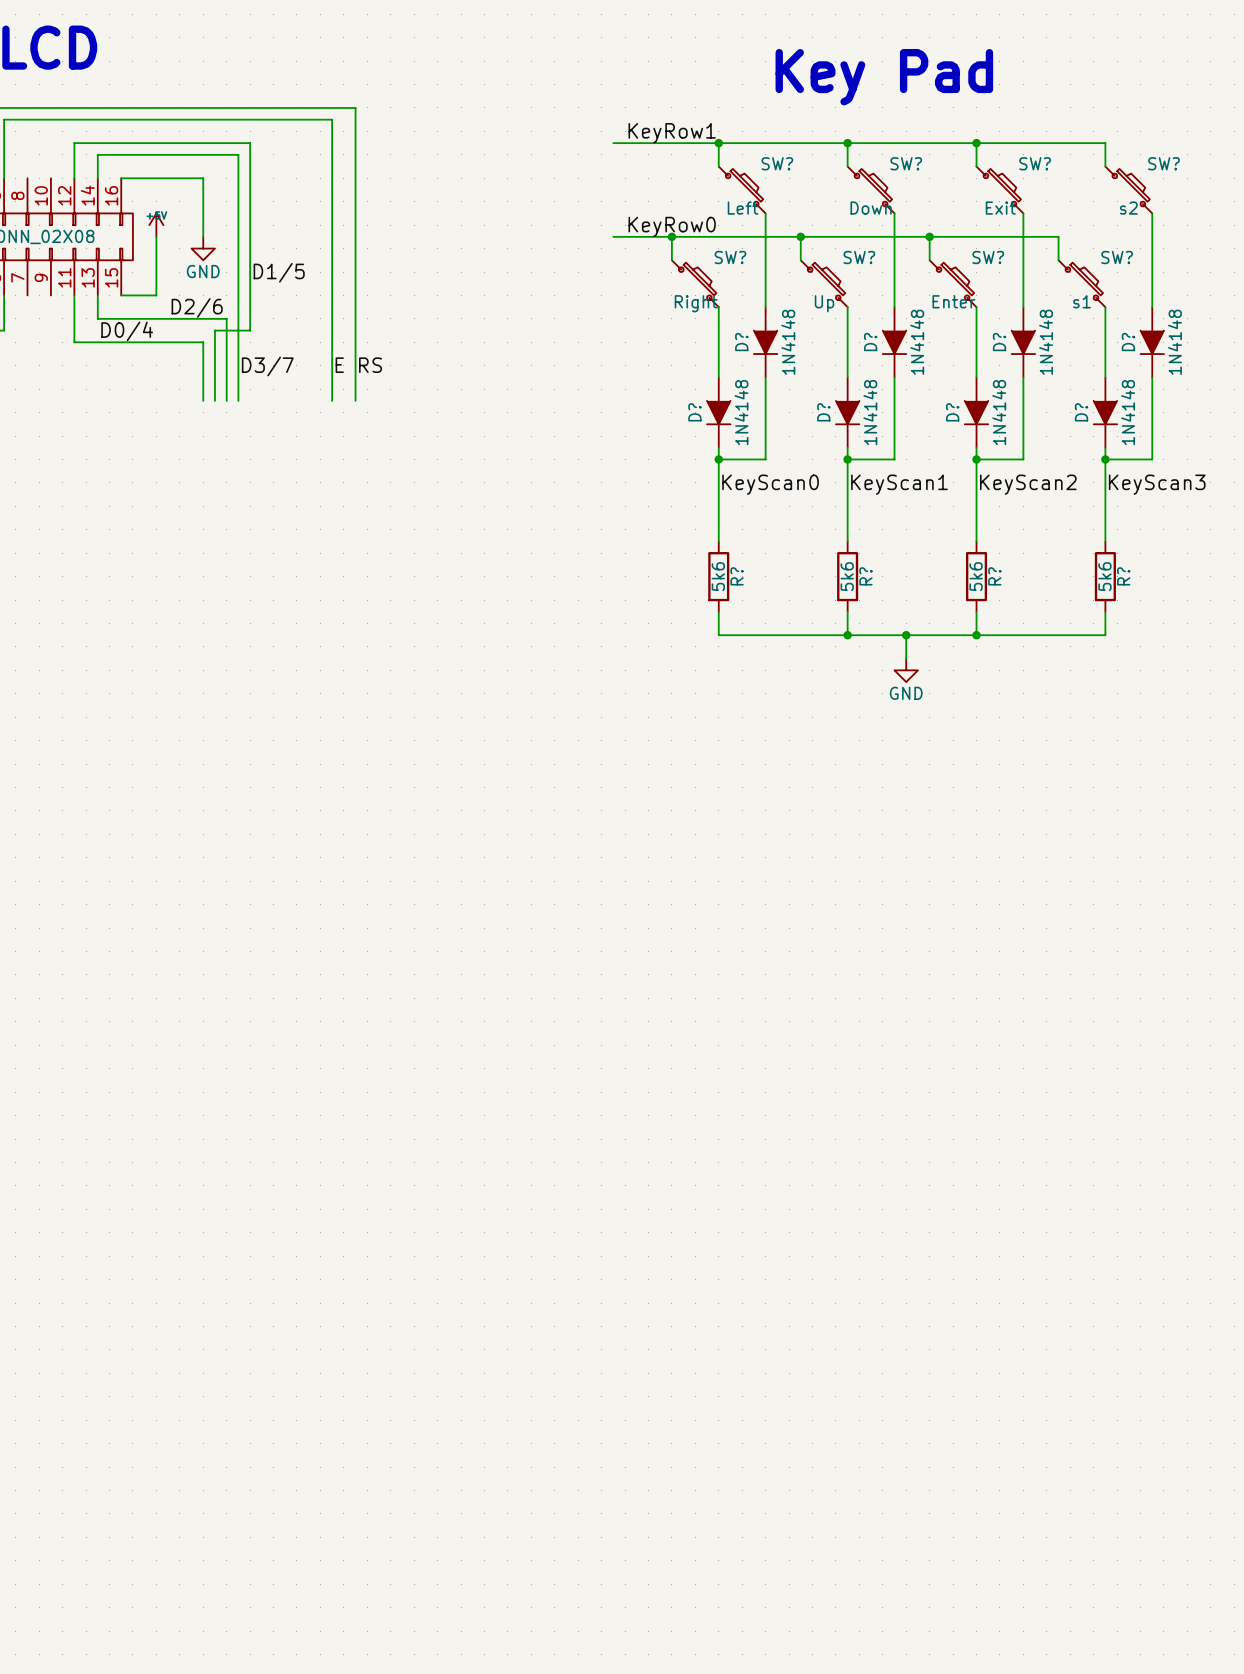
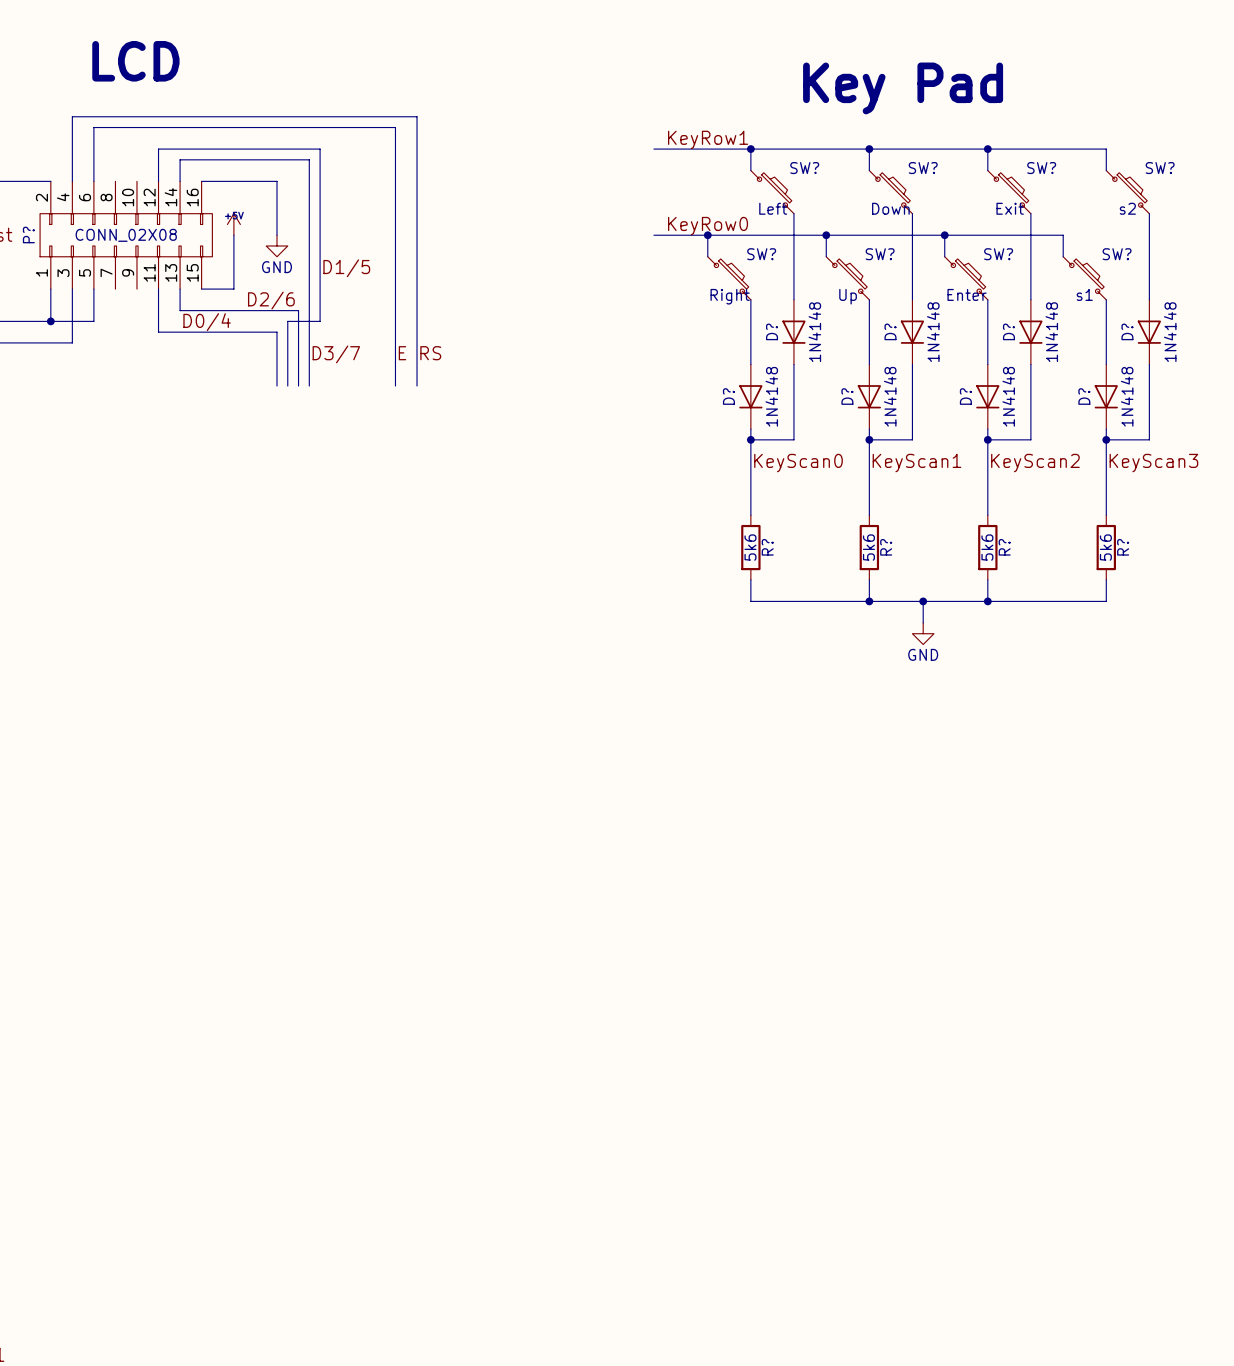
D? symbol: [753, 307, 779, 378] -> [782, 299, 806, 365]
D? symbol: [882, 307, 907, 378] -> [900, 299, 925, 365]
D? symbol: [1010, 307, 1036, 378] -> [1019, 299, 1043, 365]
D? symbol: [1139, 307, 1165, 378] -> [1137, 299, 1162, 365]
D? symbol: [706, 377, 732, 448] -> [739, 364, 763, 430]
D? symbol: [835, 377, 861, 448] -> [857, 364, 881, 430]
D? symbol: [964, 377, 989, 448] -> [976, 364, 1000, 430]
D? symbol: [1092, 377, 1118, 448] -> [1094, 364, 1118, 430]

